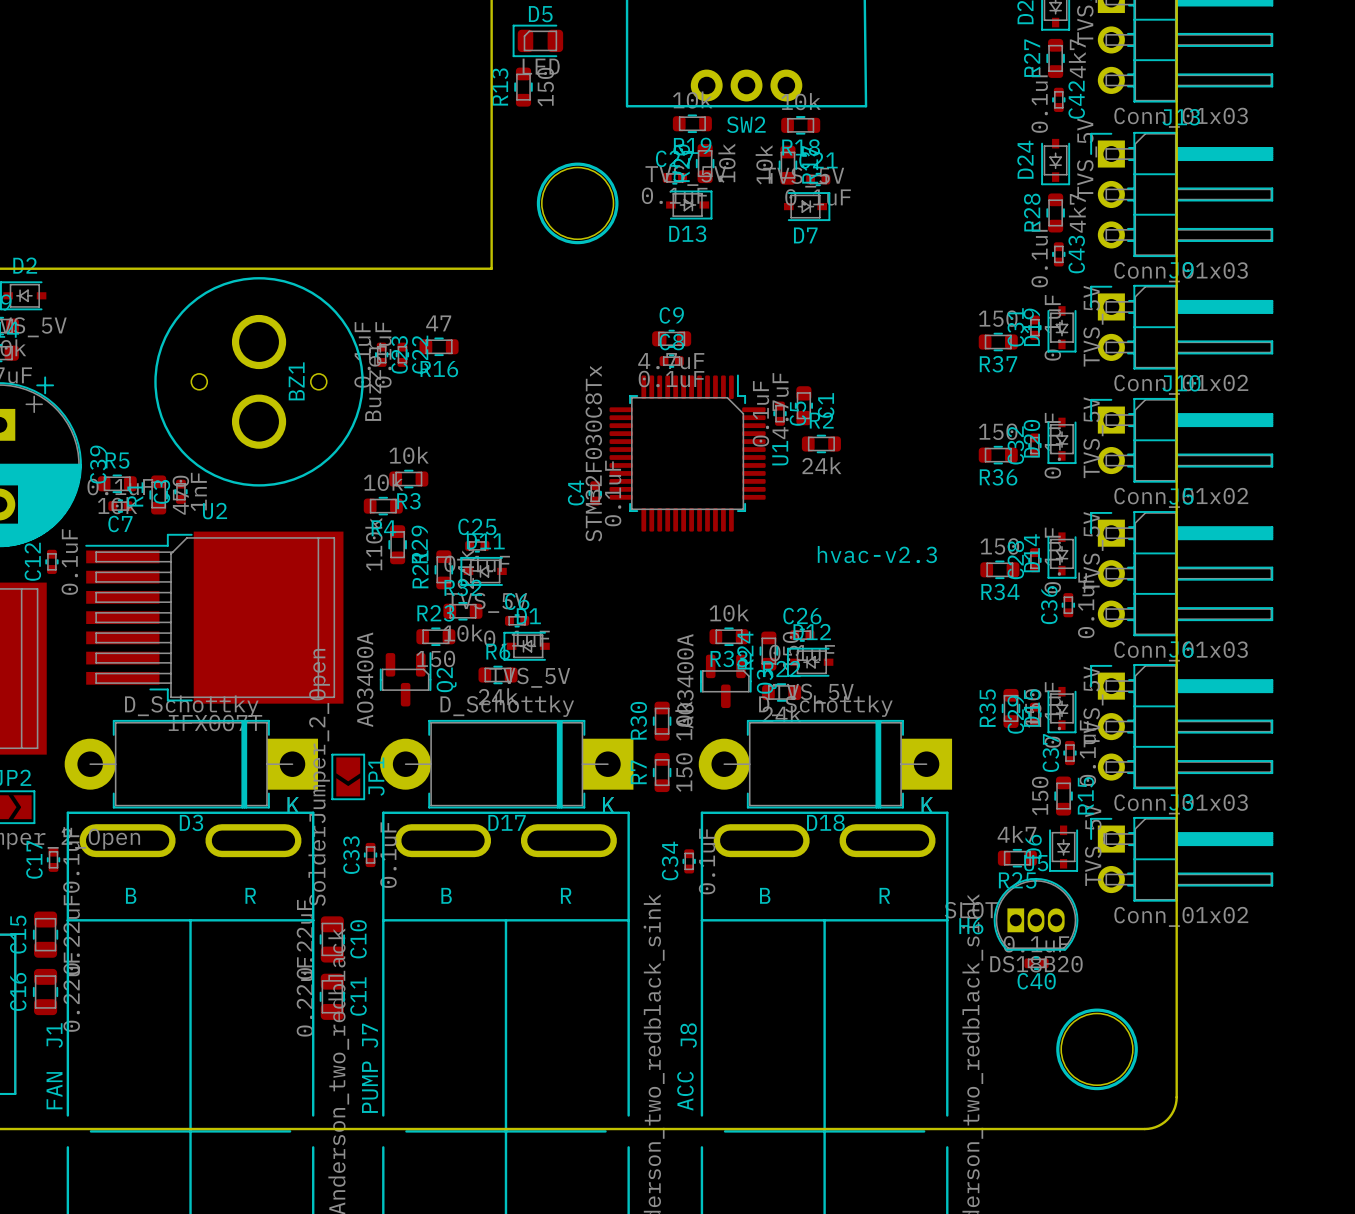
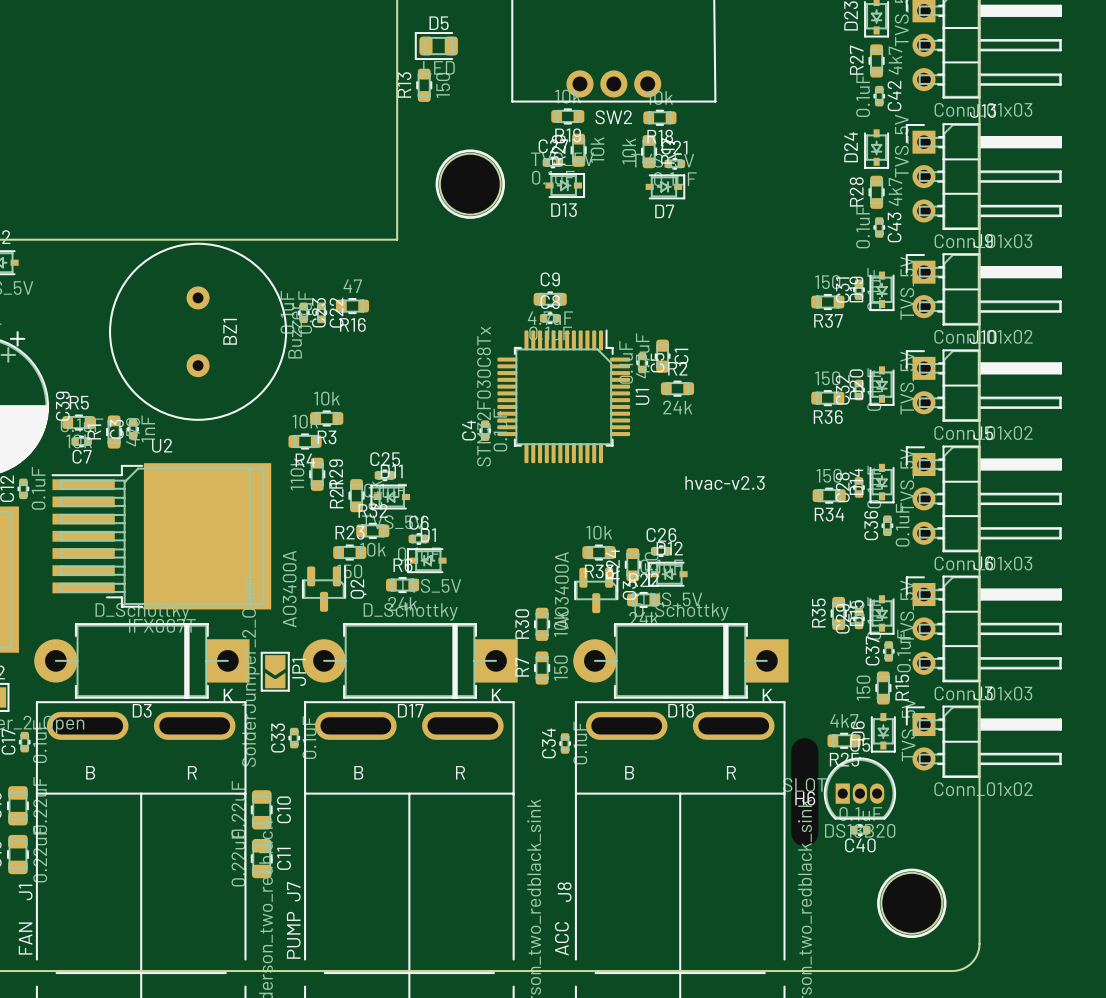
BZ1 footprint: [154, 277, 364, 487] -> [109, 242, 288, 421]

